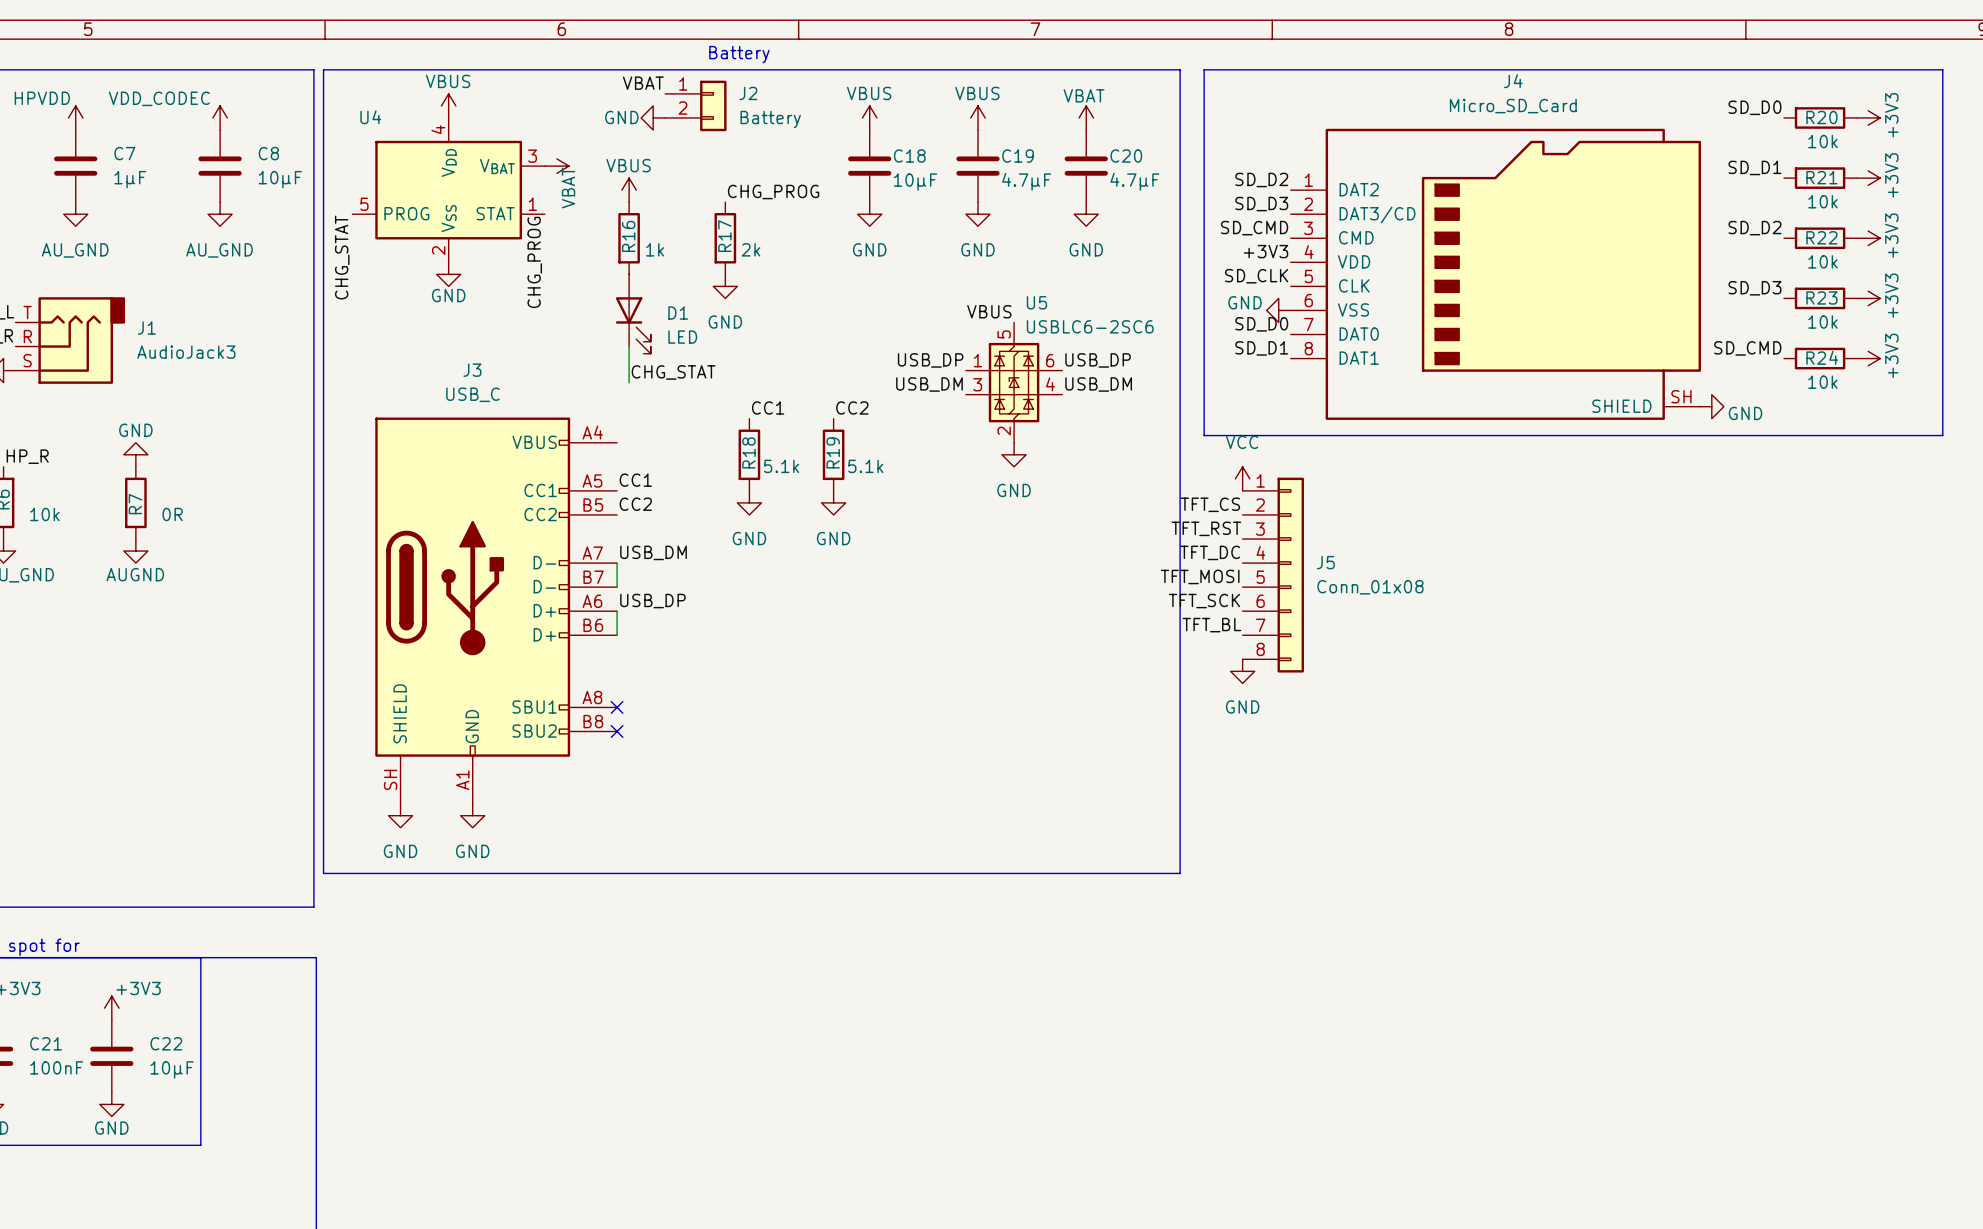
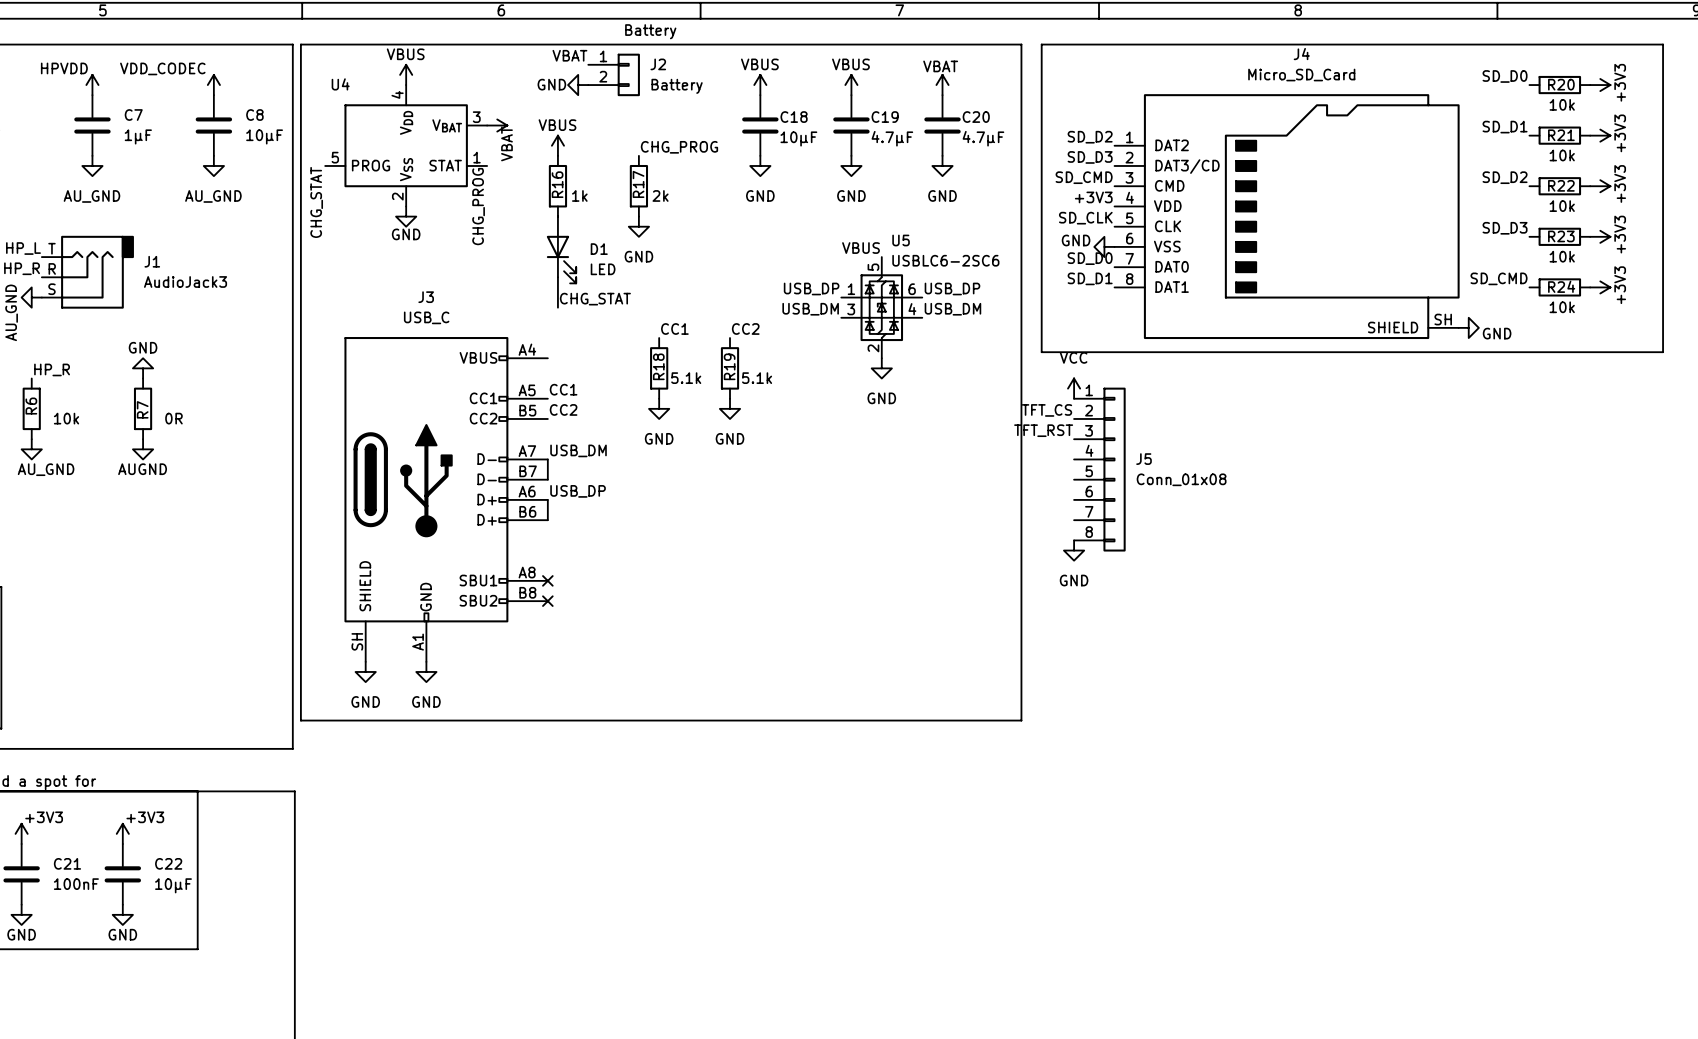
label: TFT_DC (1210, 552) -> none
label: TFT_MOSI (1200, 576) -> none
label: TFT_SCK (1204, 601) -> none
label: TFT_BL (1211, 625) -> none

